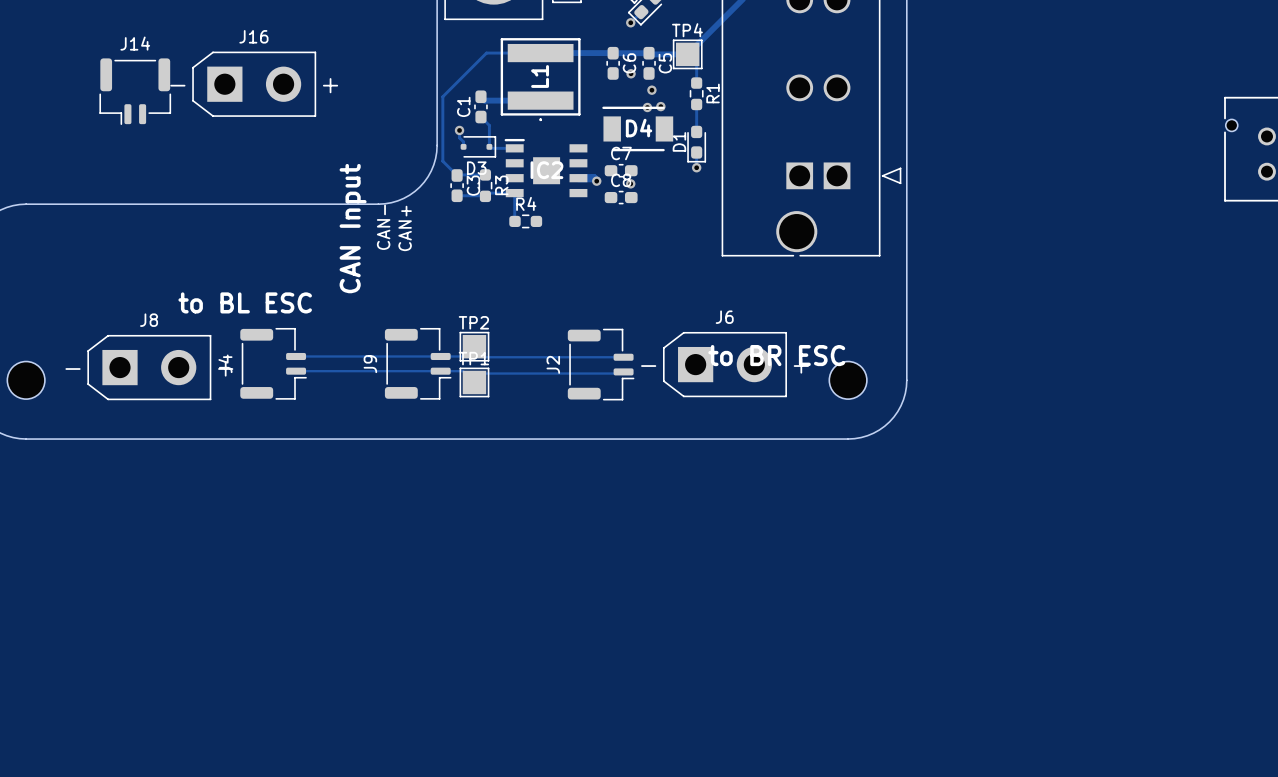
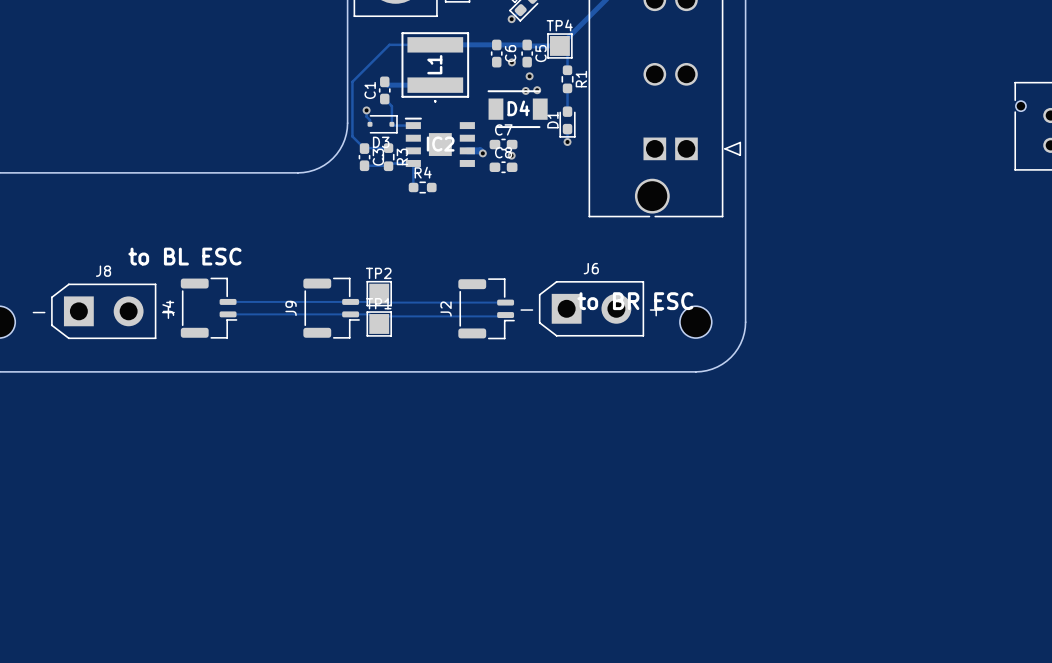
J16: (254, 84) -> none
J14: (135, 91) -> none
text: CAN- (383, 227) -> none
text: CAN Input (353, 228) -> none
text: CAN+ (405, 228) -> none

